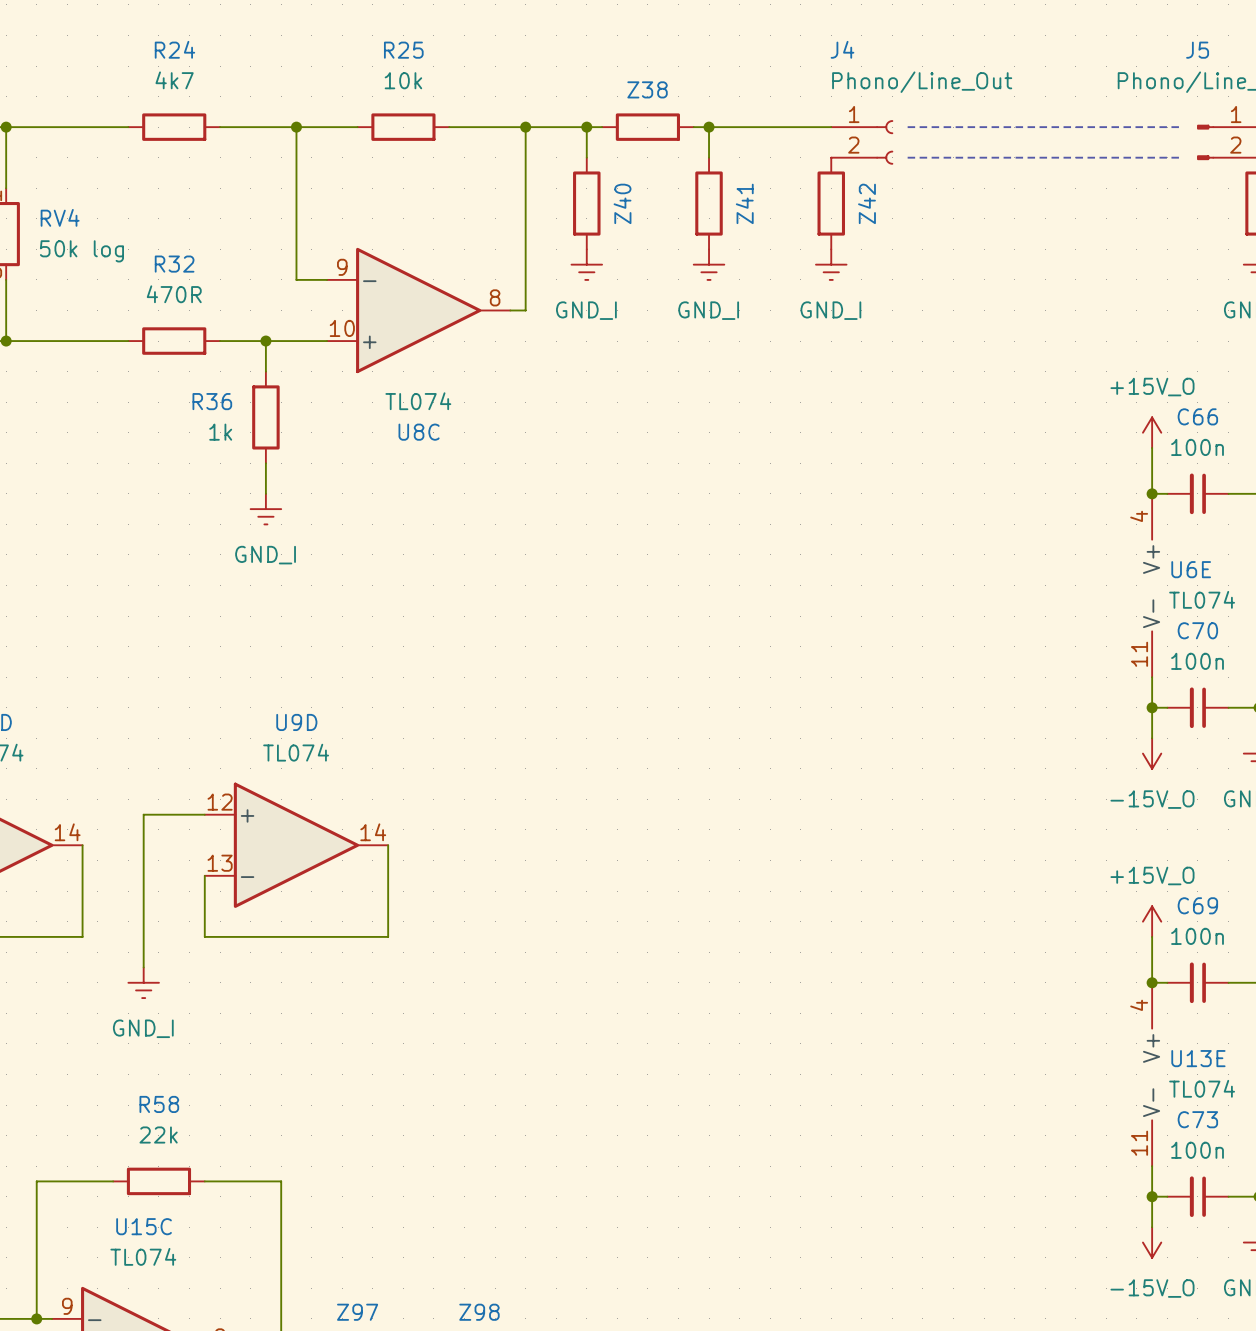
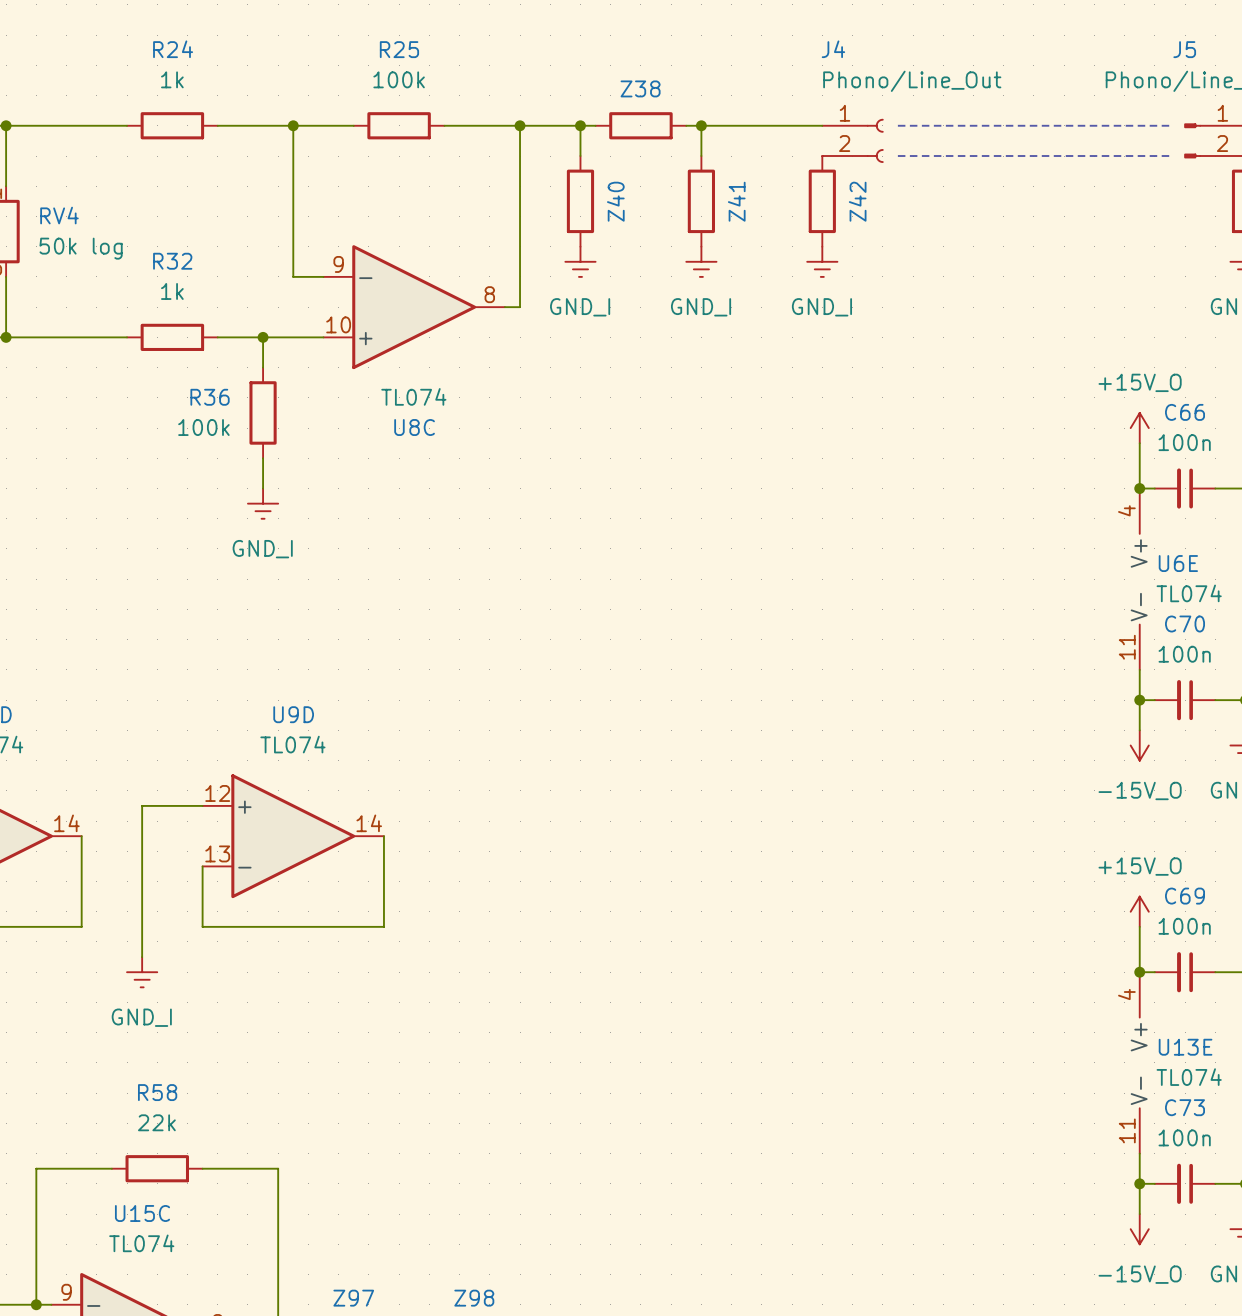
R24 value: 4k7 (174, 80) -> 1k (172, 79)
R25 value: 10k (403, 80) -> 100k (399, 79)
R32 value: 470R (174, 294) -> 1k (172, 291)
R36 value: 1k (220, 432) -> 100k (203, 427)

